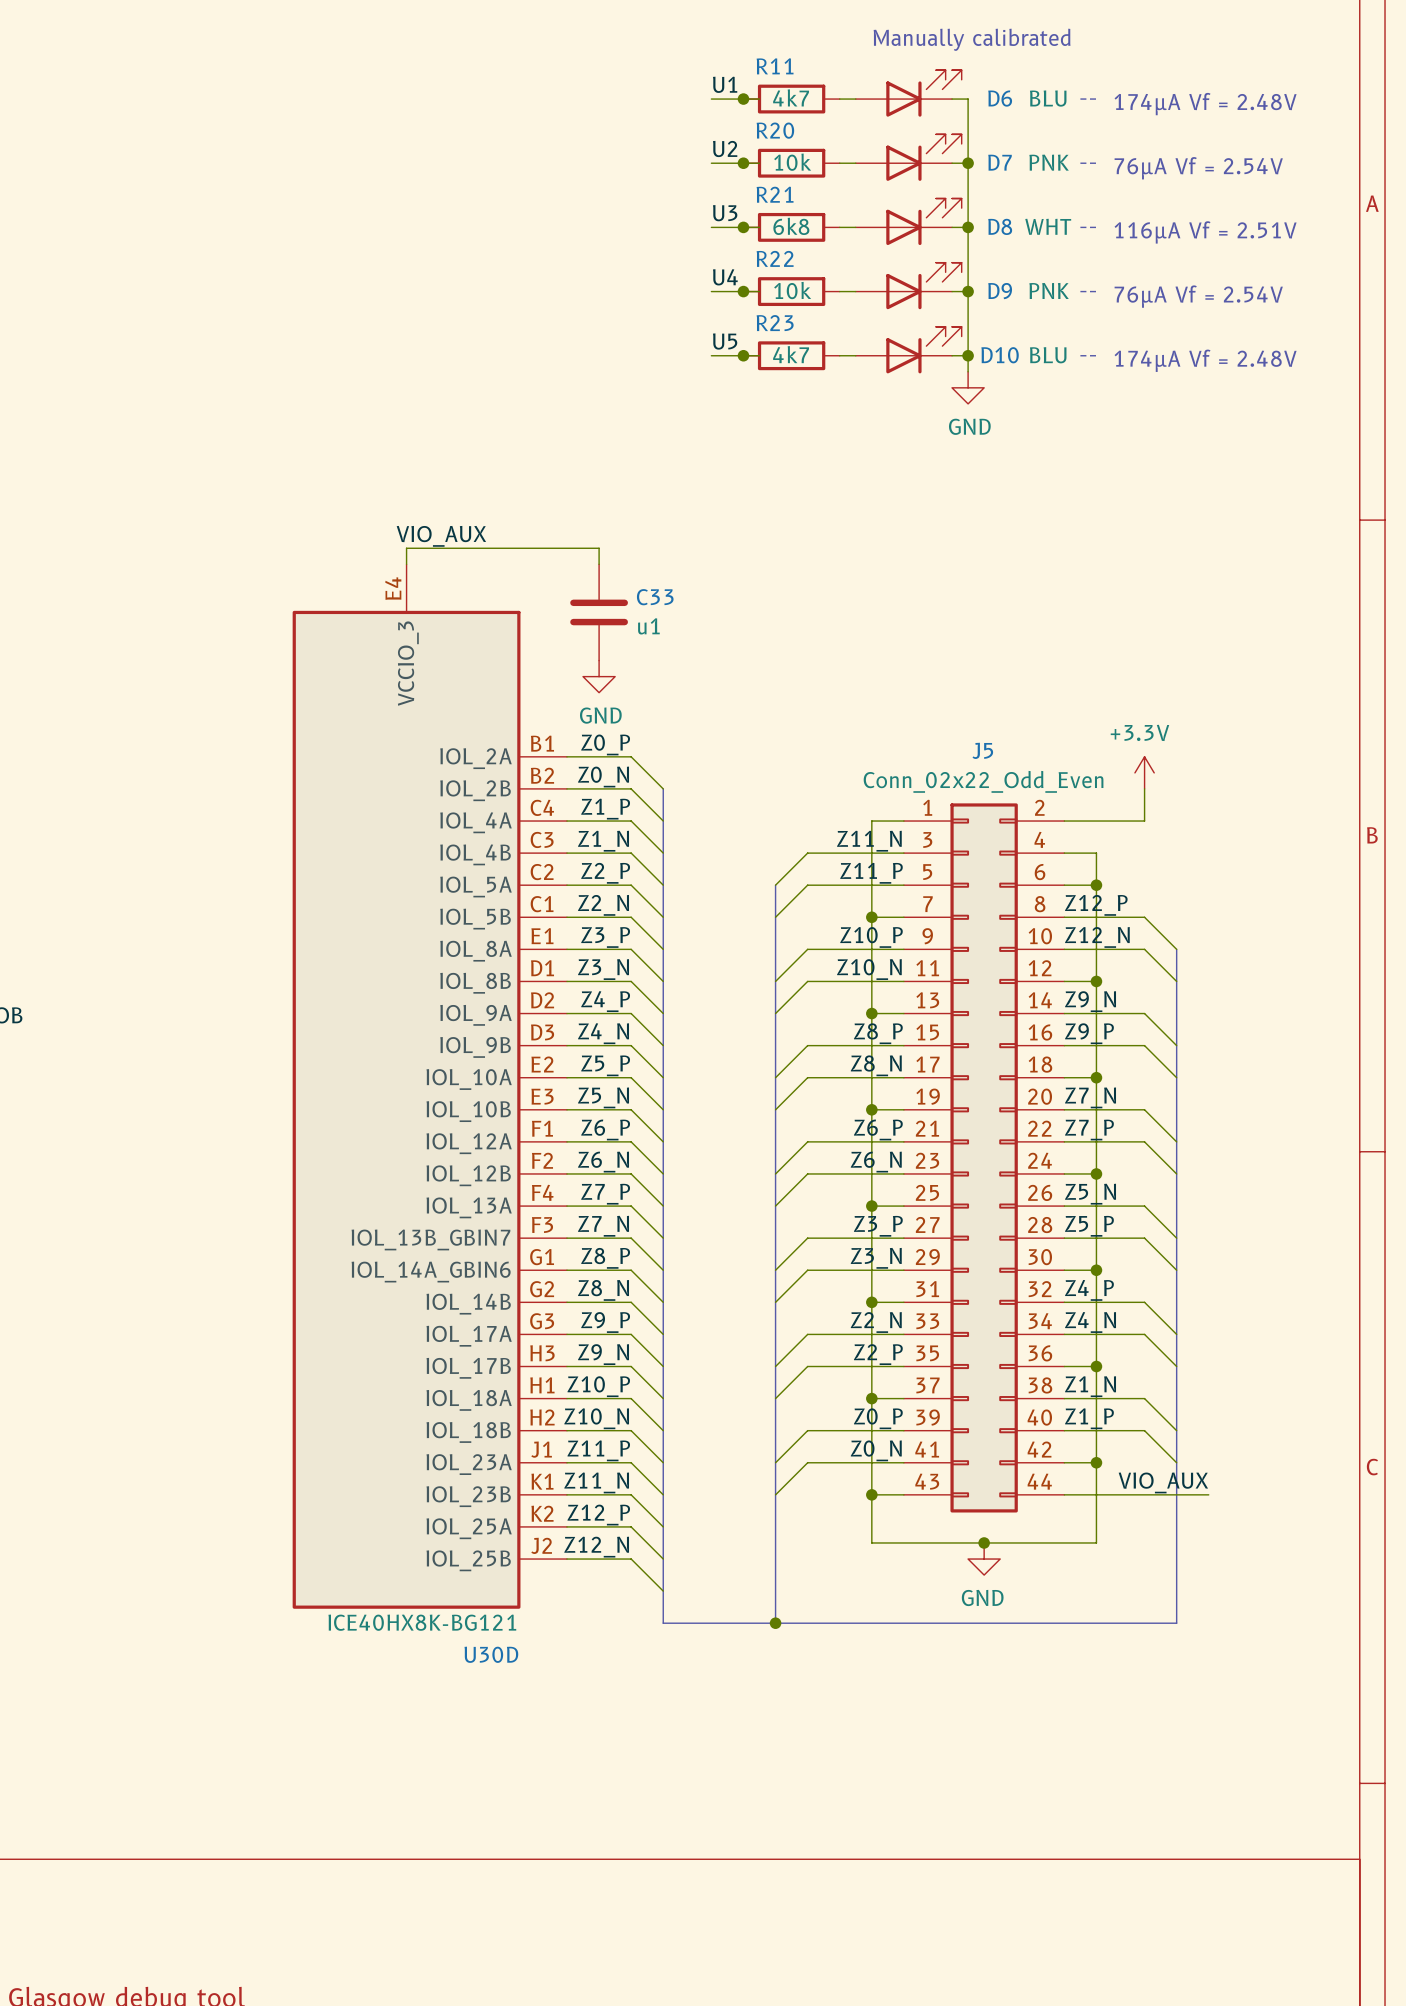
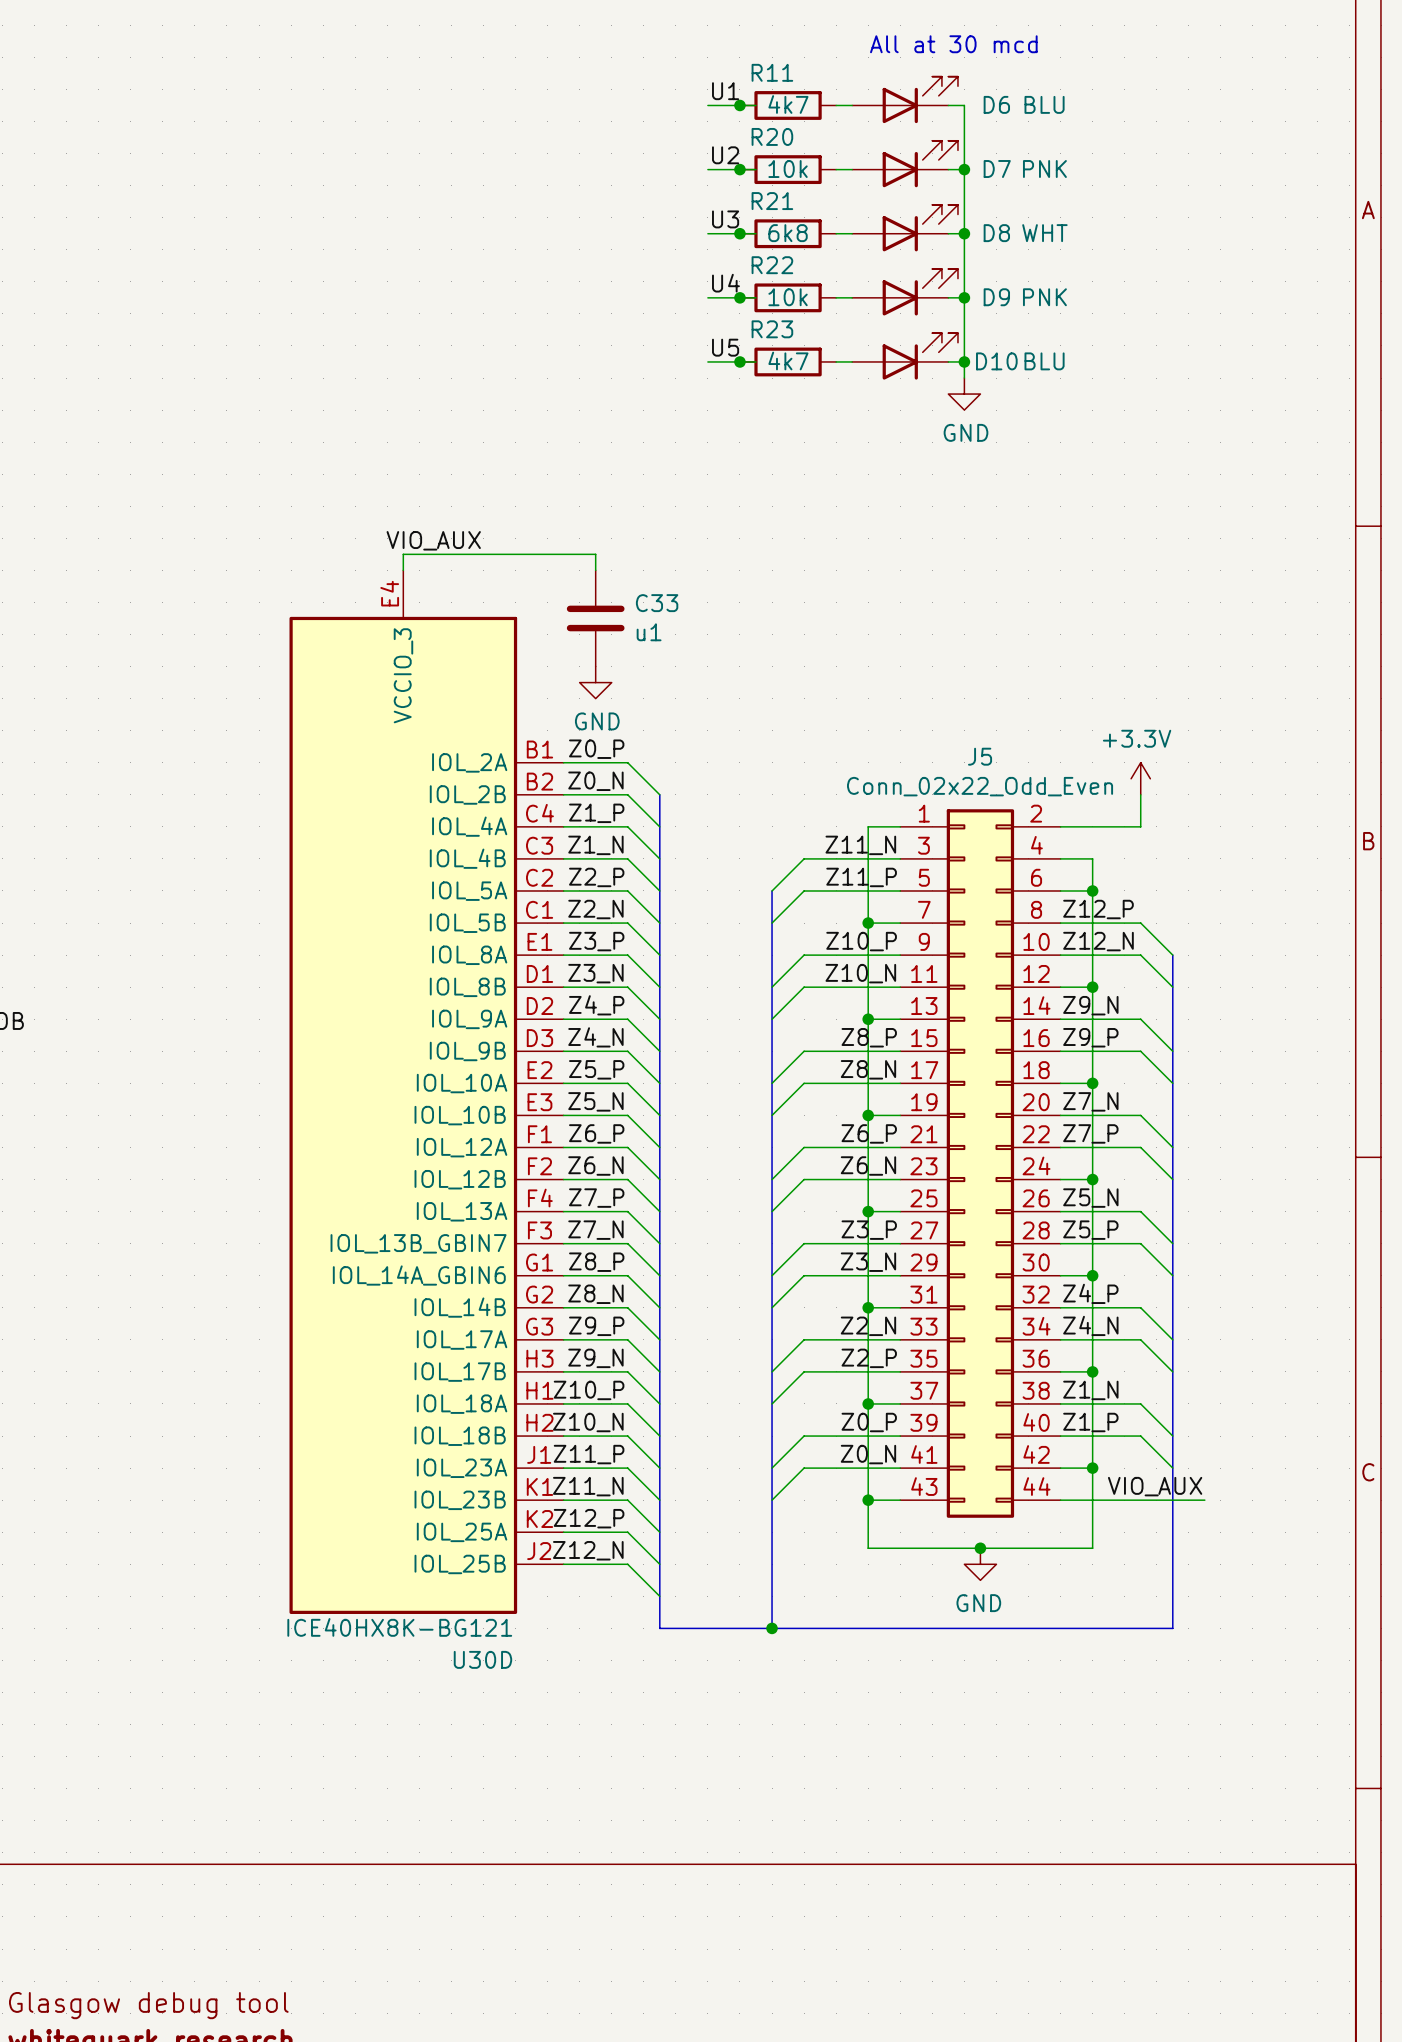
text: Manually calibrated (972, 39) -> All at 30 mcd (953, 44)
line: (1080, 99) (1096, 99) -> none
text: 174µA Vf = 2.48V (1205, 104) -> none
line: (1080, 163) (1096, 163) -> none
text: 76µA Vf = 2.54V (1198, 168) -> none
line: (1080, 227) (1096, 227) -> none
text: 116µA Vf = 2.51V (1205, 232) -> none
line: (1080, 291) (1096, 291) -> none
text: 76µA Vf = 2.54V (1198, 296) -> none
line: (1080, 355) (1096, 355) -> none
text: 174µA Vf = 2.48V (1205, 360) -> none

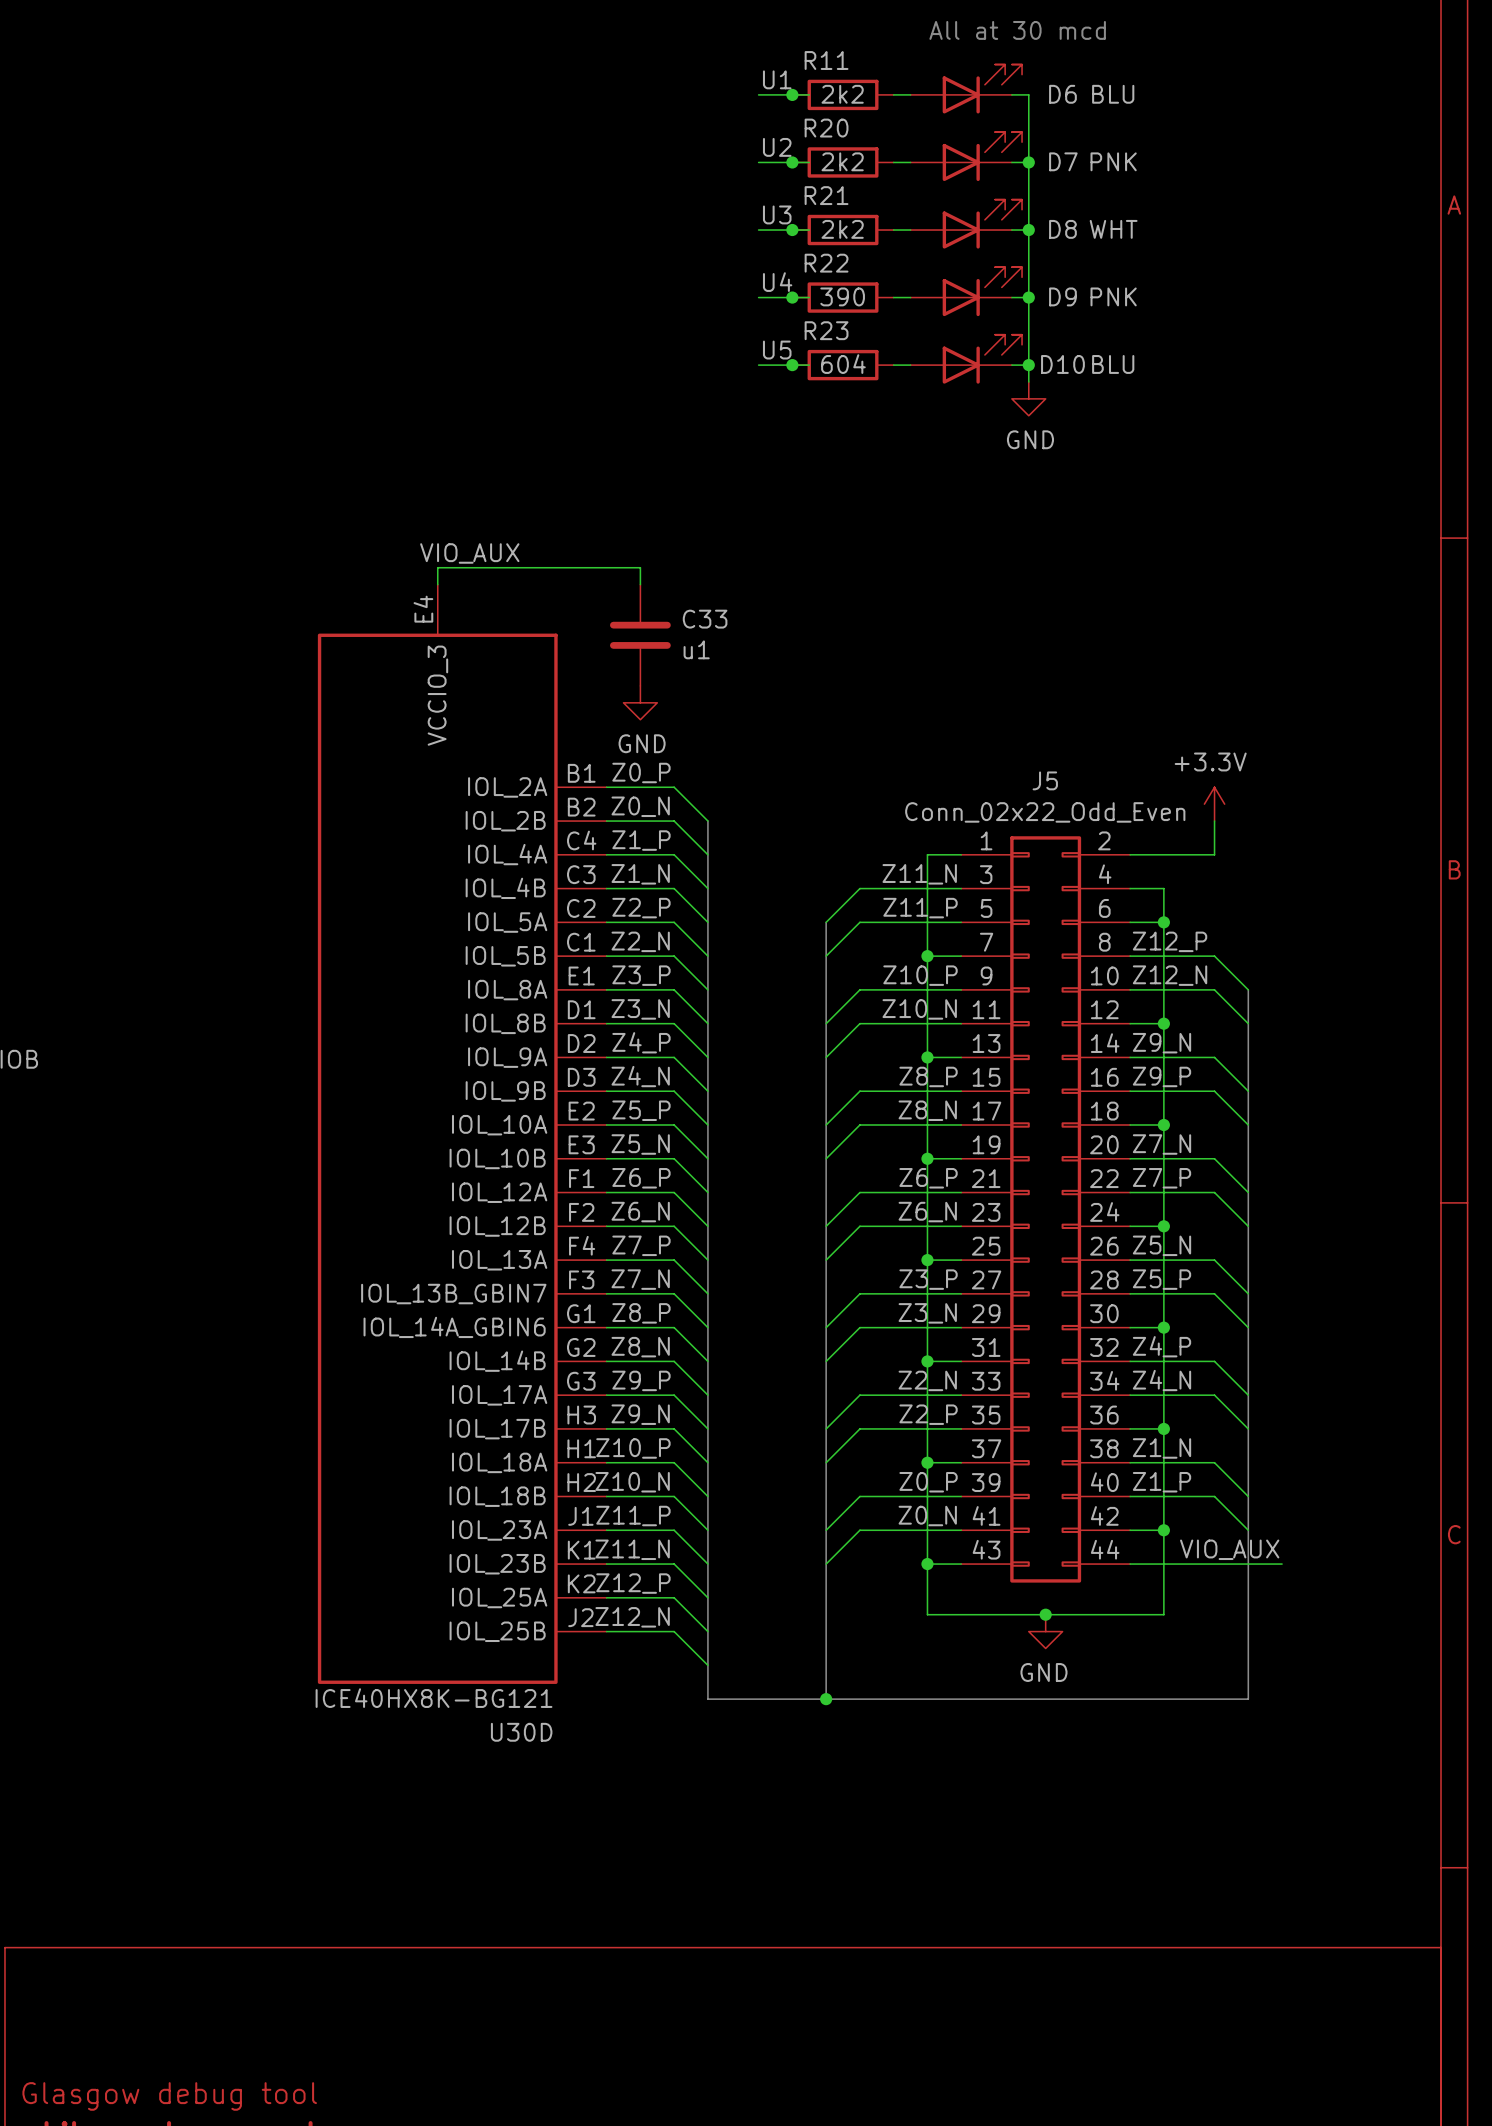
R11 value: 4k7 (788, 104) -> 2k2 (842, 94)
R20 value: 10k (788, 169) -> 2k2 (842, 161)
R21 value: 6k8 (788, 233) -> 2k2 (842, 229)
R22 value: 10k (788, 297) -> 390 (842, 296)
R23 value: 4k7 (788, 360) -> 604 (843, 364)

